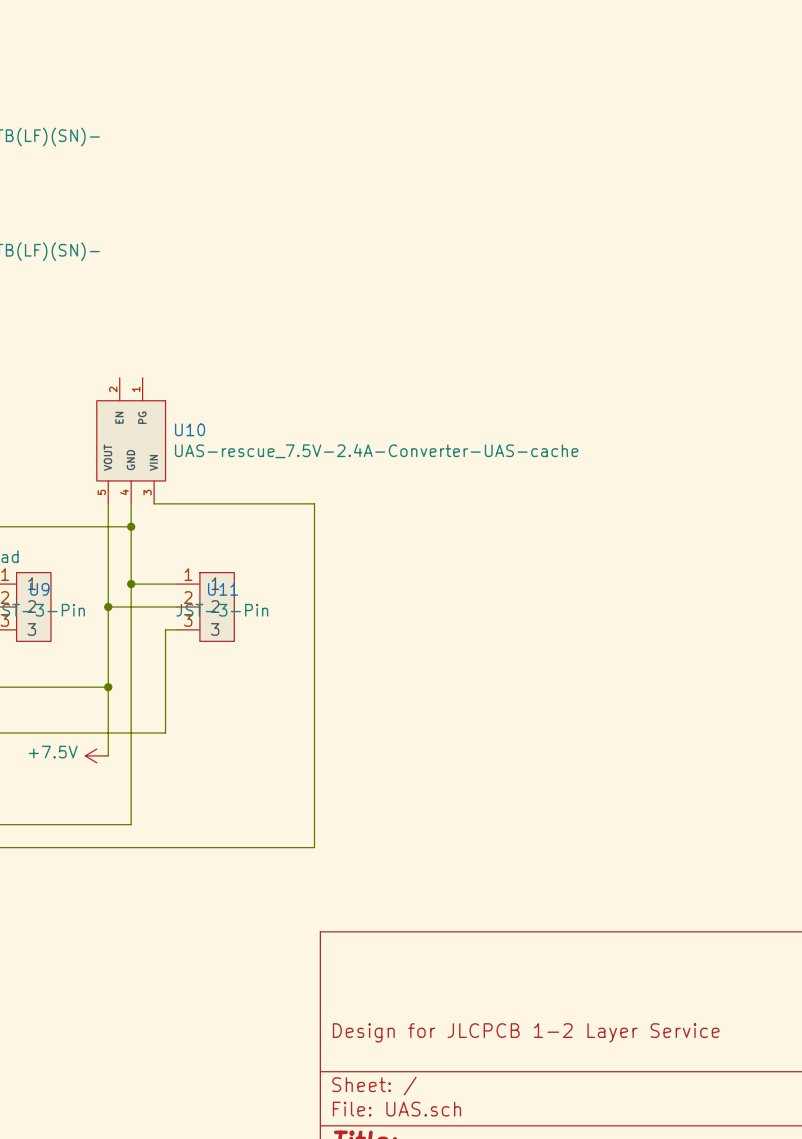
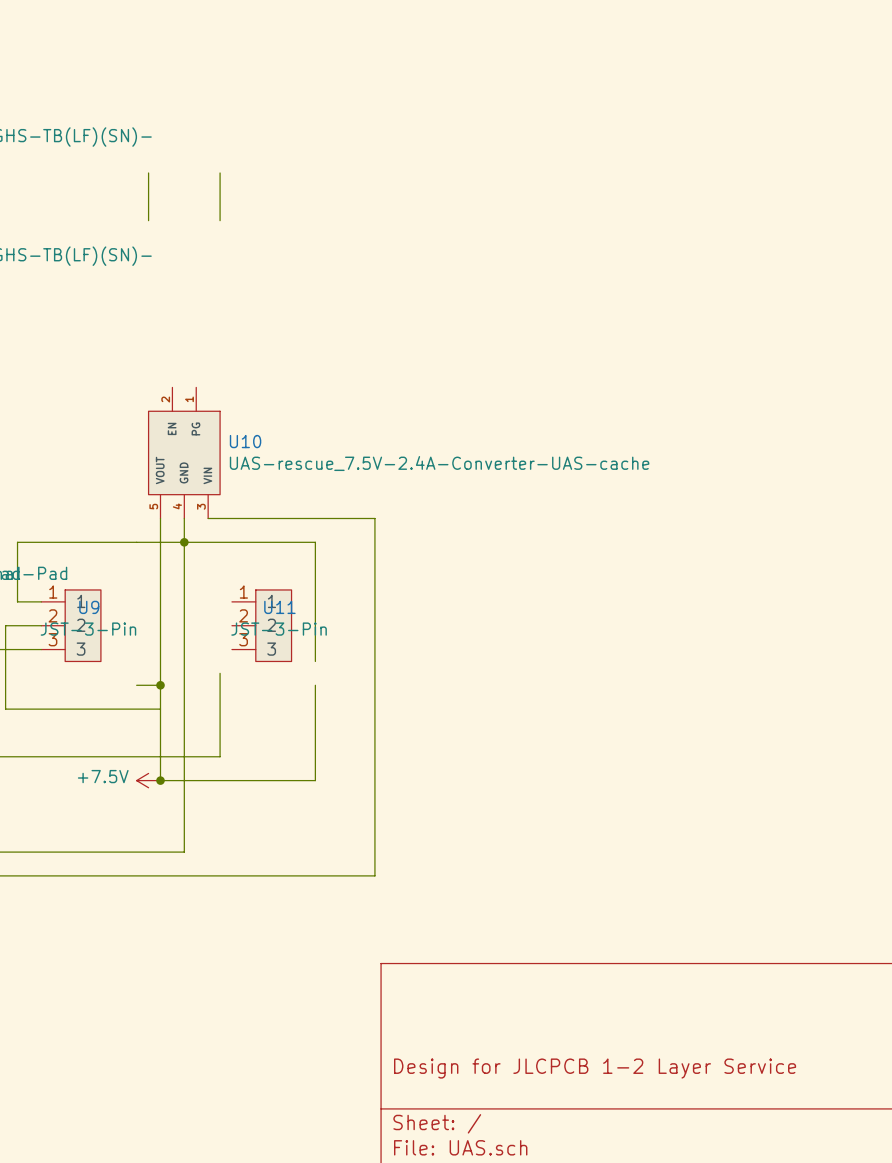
wire: none -> (148, 172) (148, 220)
wire: none -> (220, 172) (220, 220)
wire: none -> (184, 542) (315, 542) (315, 661)
wire: (131, 584) (177, 584) -> none
junction: (131, 584) -> none
wire: (108, 606) (177, 606) -> none
junction: (108, 606) -> none
wire: (177, 629) (165, 629) (165, 652) -> none
wire: none -> (136, 685) (160, 685)
wire: none -> (315, 685) (315, 780) (160, 780)
junction position: (108, 687) -> (160, 685)
junction: none -> (160, 780)

